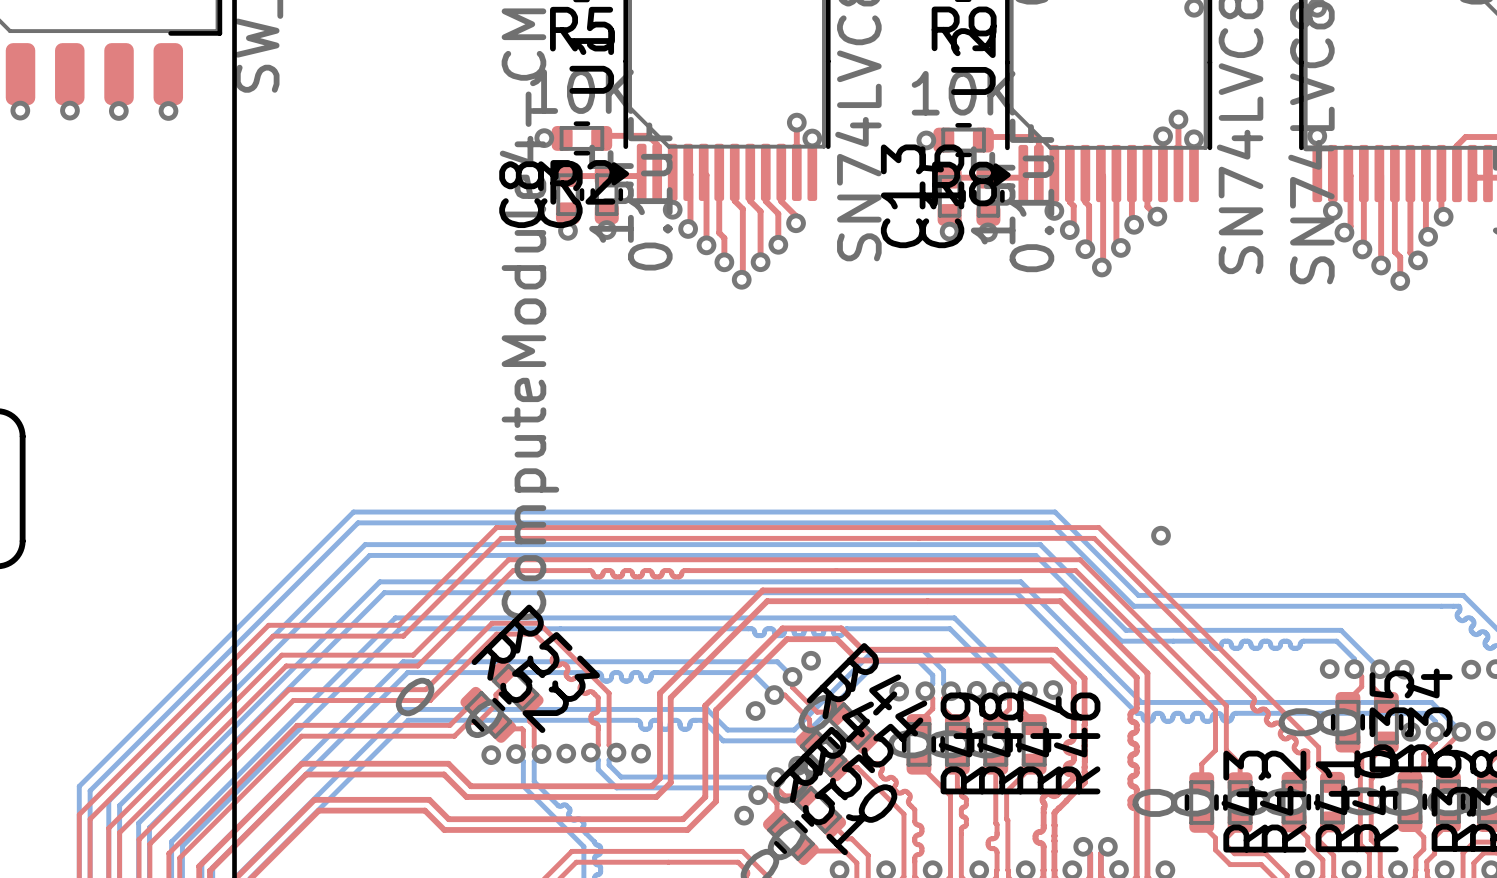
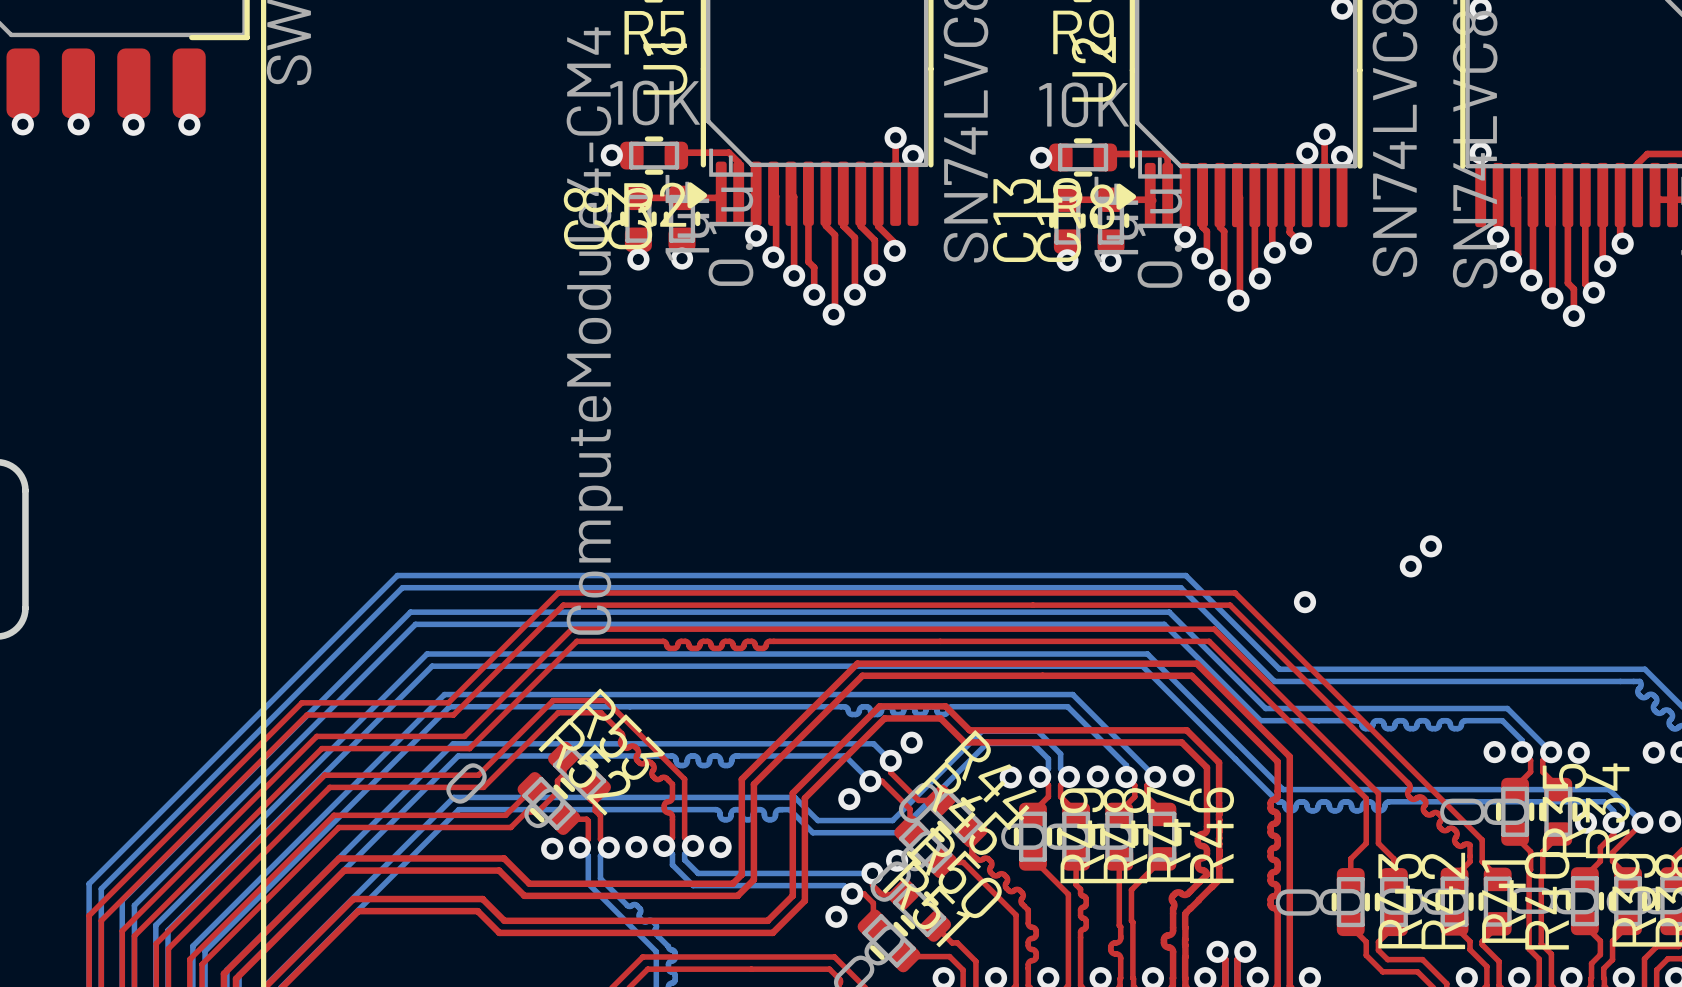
via: none -> (1430, 546)
via: none -> (1410, 566)

